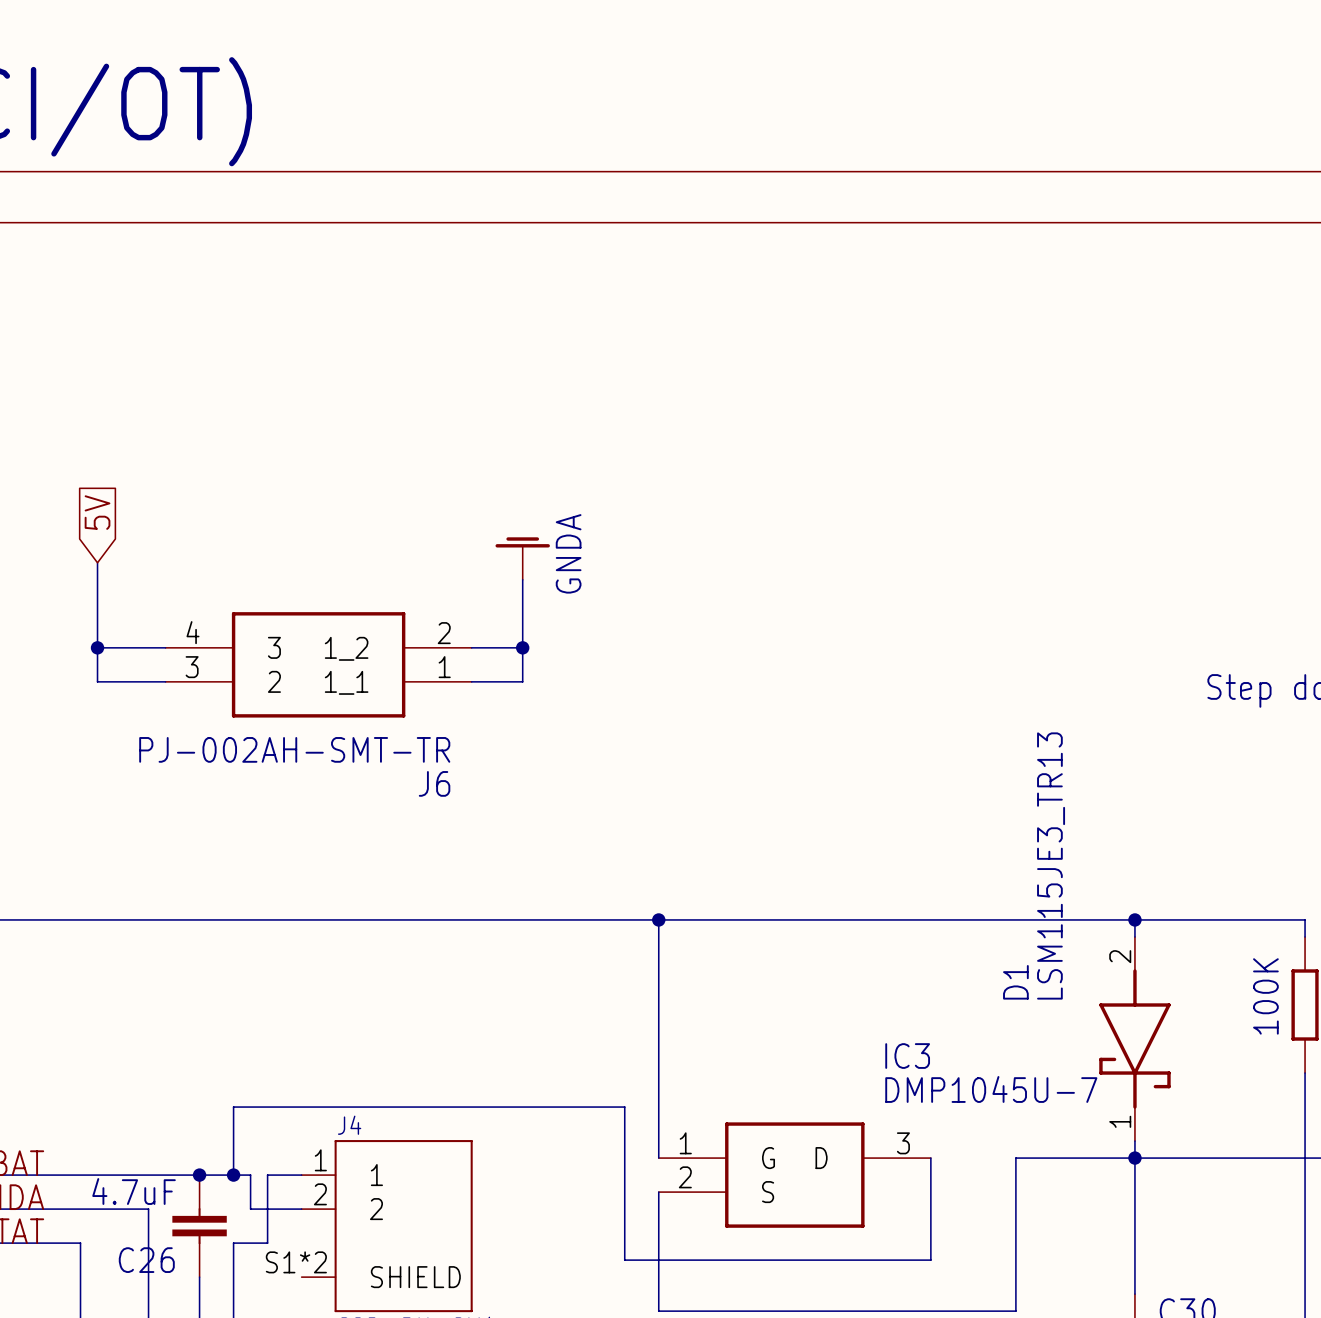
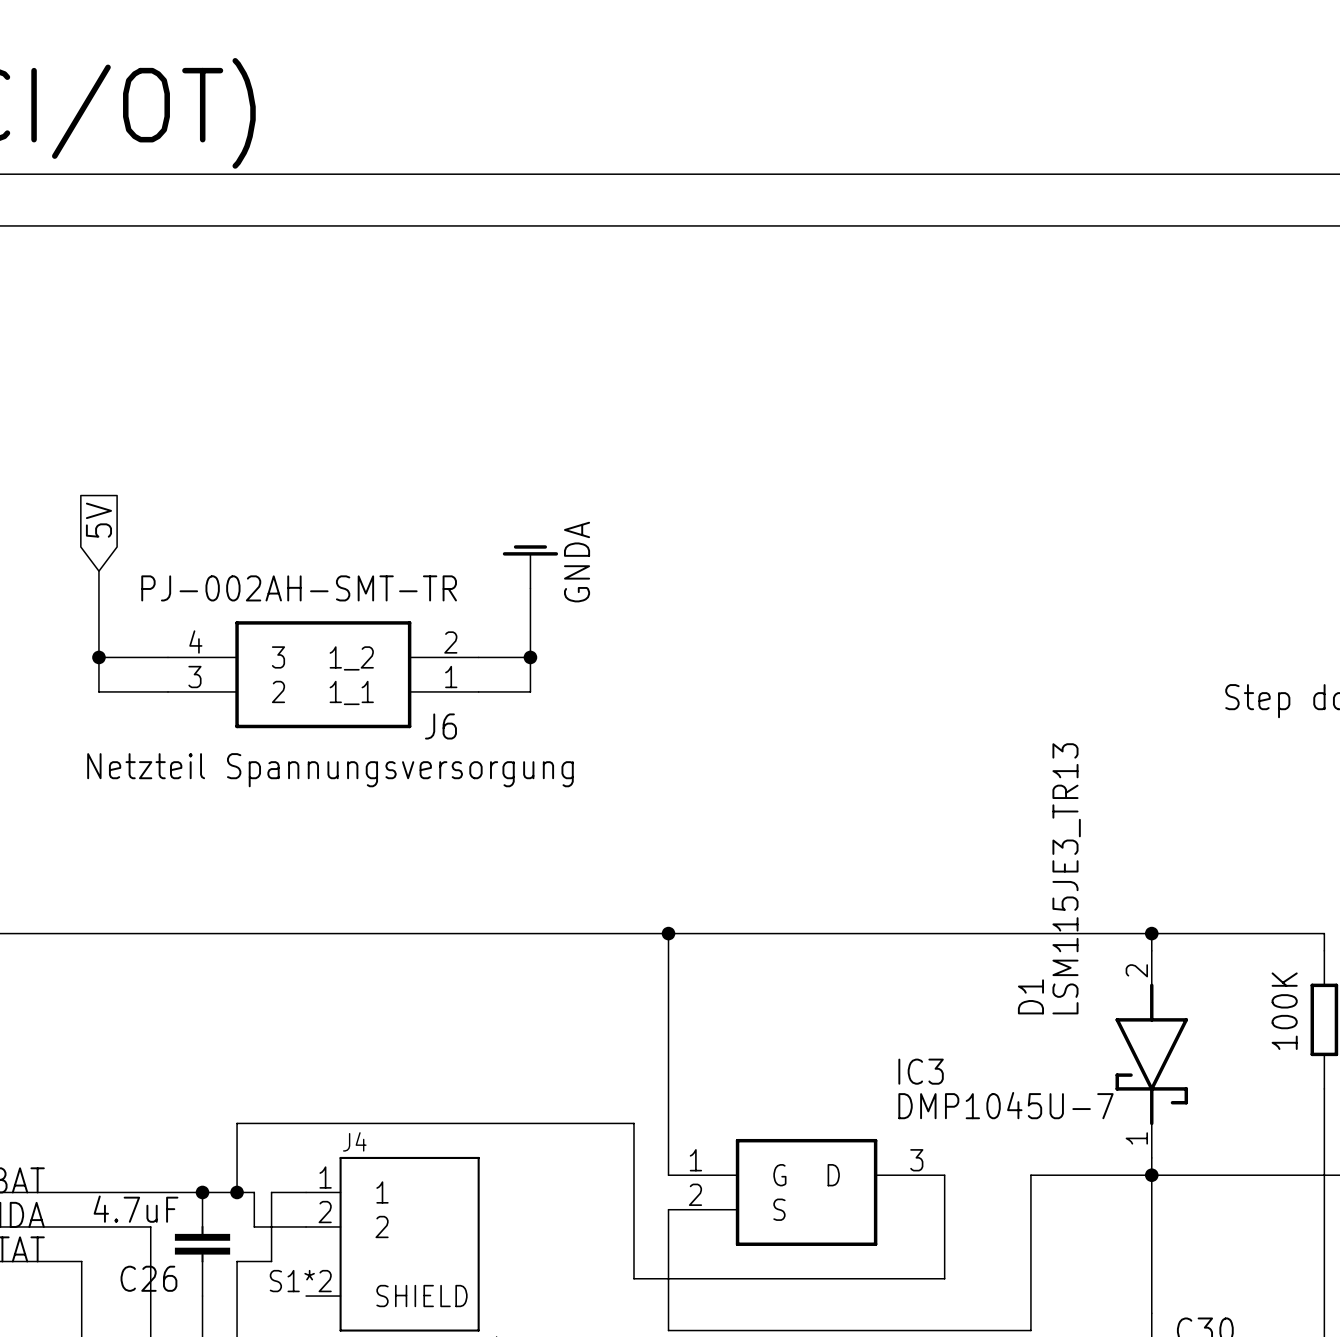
J6 value position: PJ-002AH-SMT-TR (294, 749) -> PJ-002AH-SMT-TR (299, 588)
text: none -> Netzteil Spannungsversorgung (330, 770)
J6 name position: J6 (434, 783) -> J6 (440, 726)

